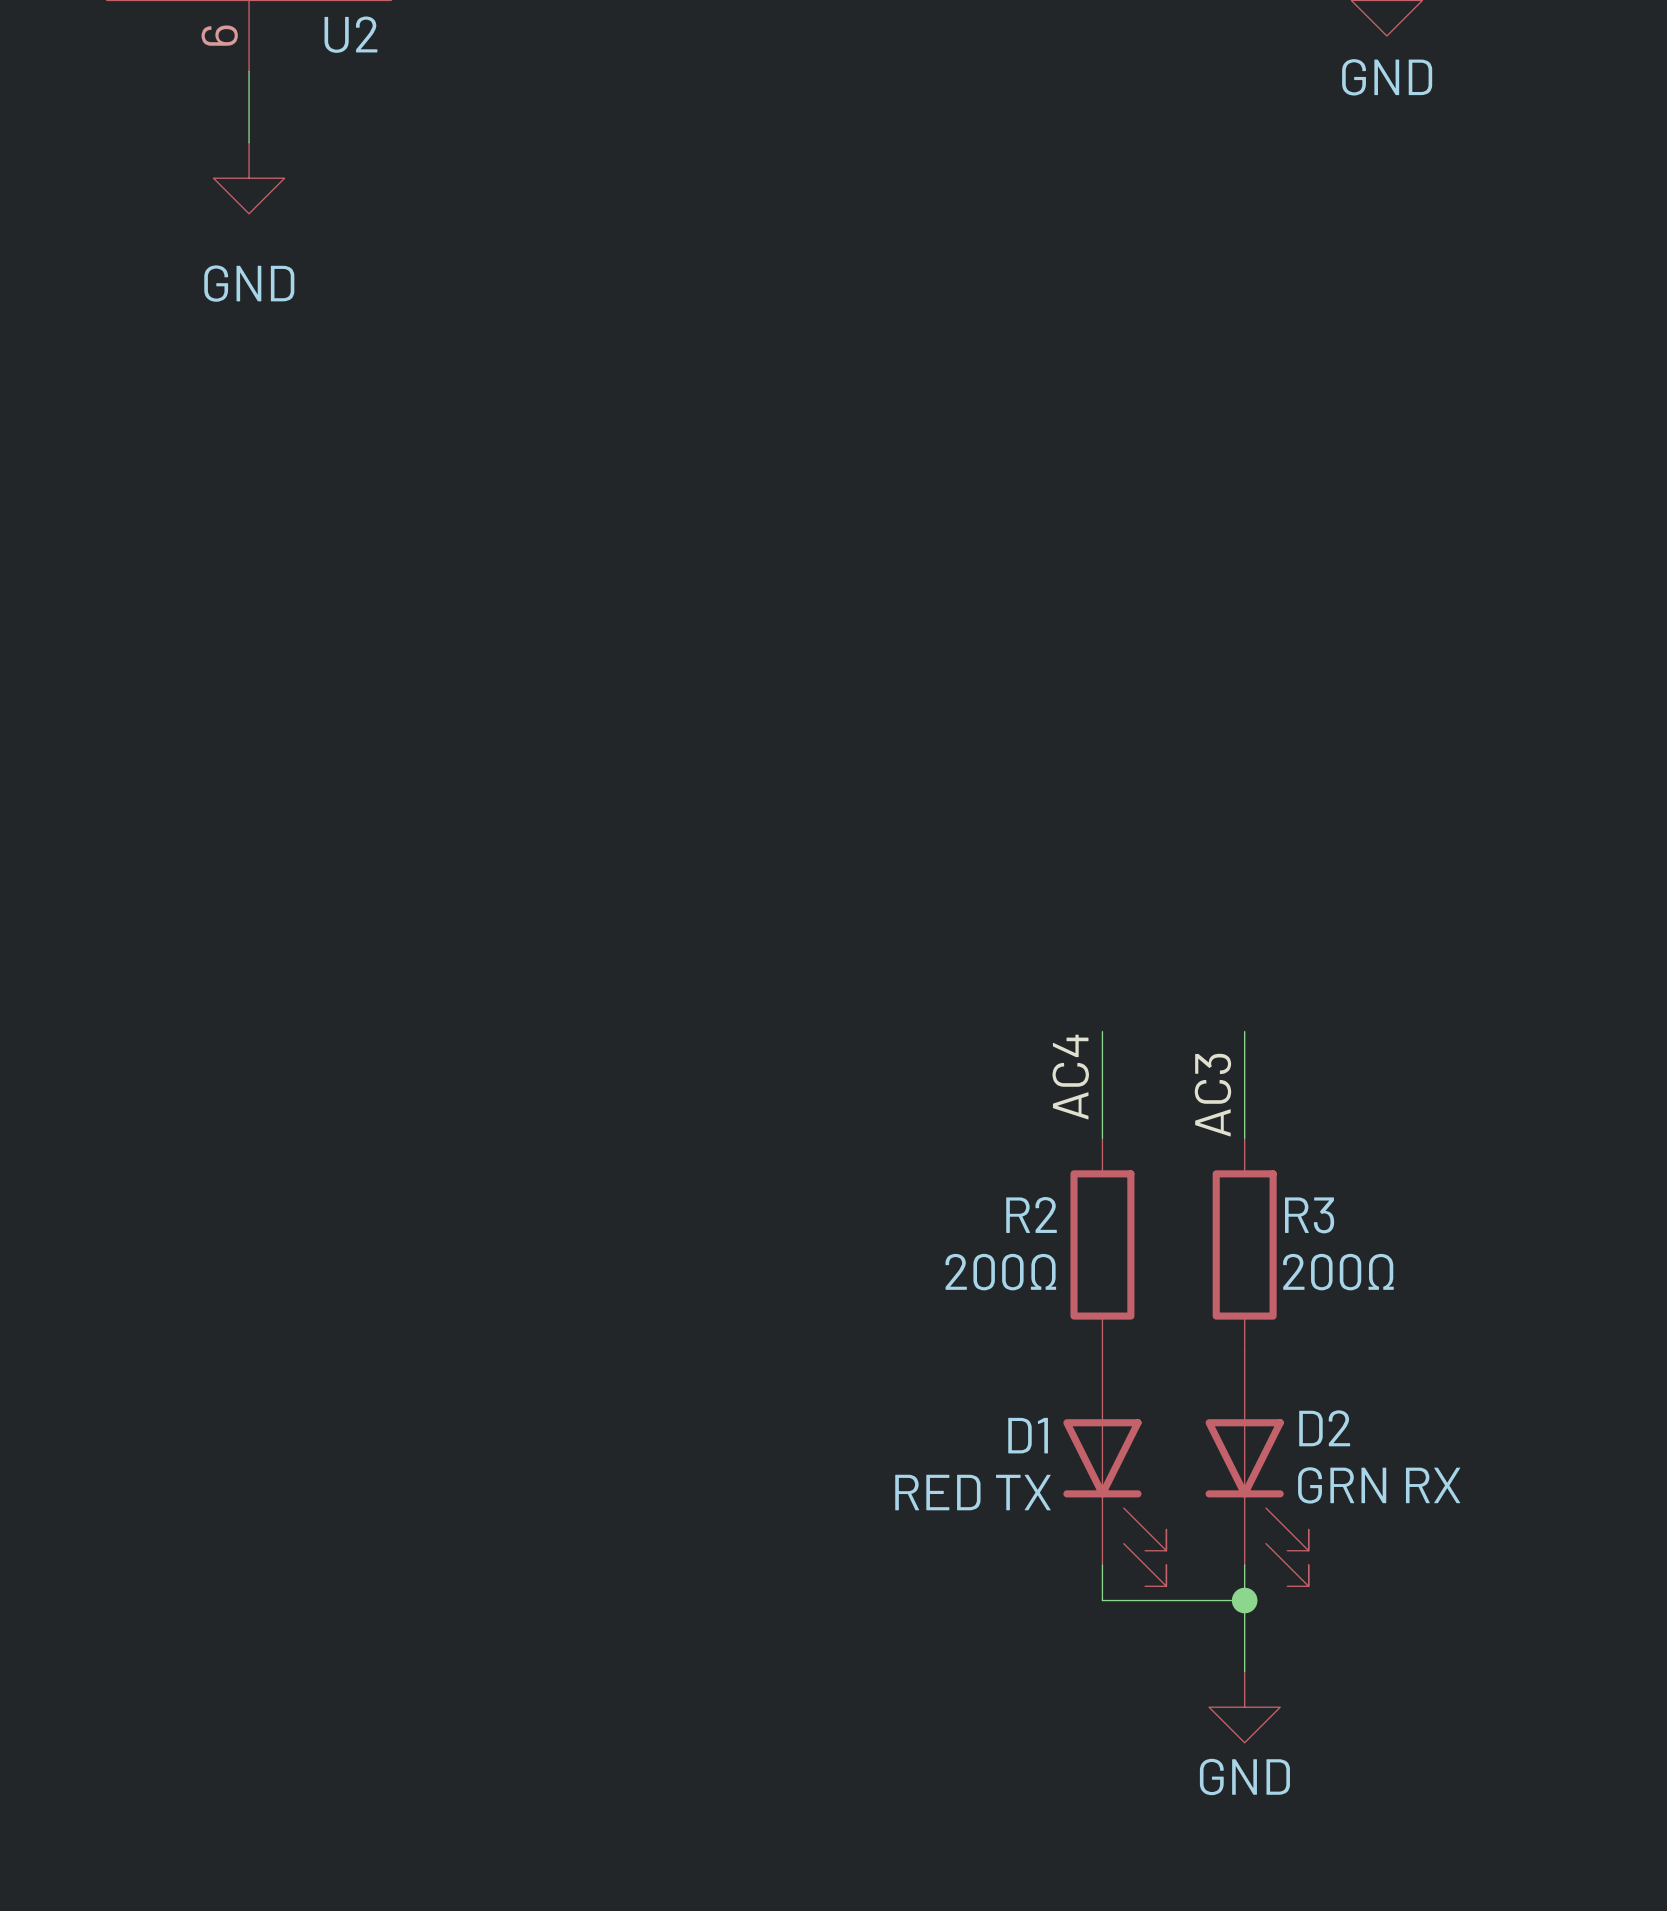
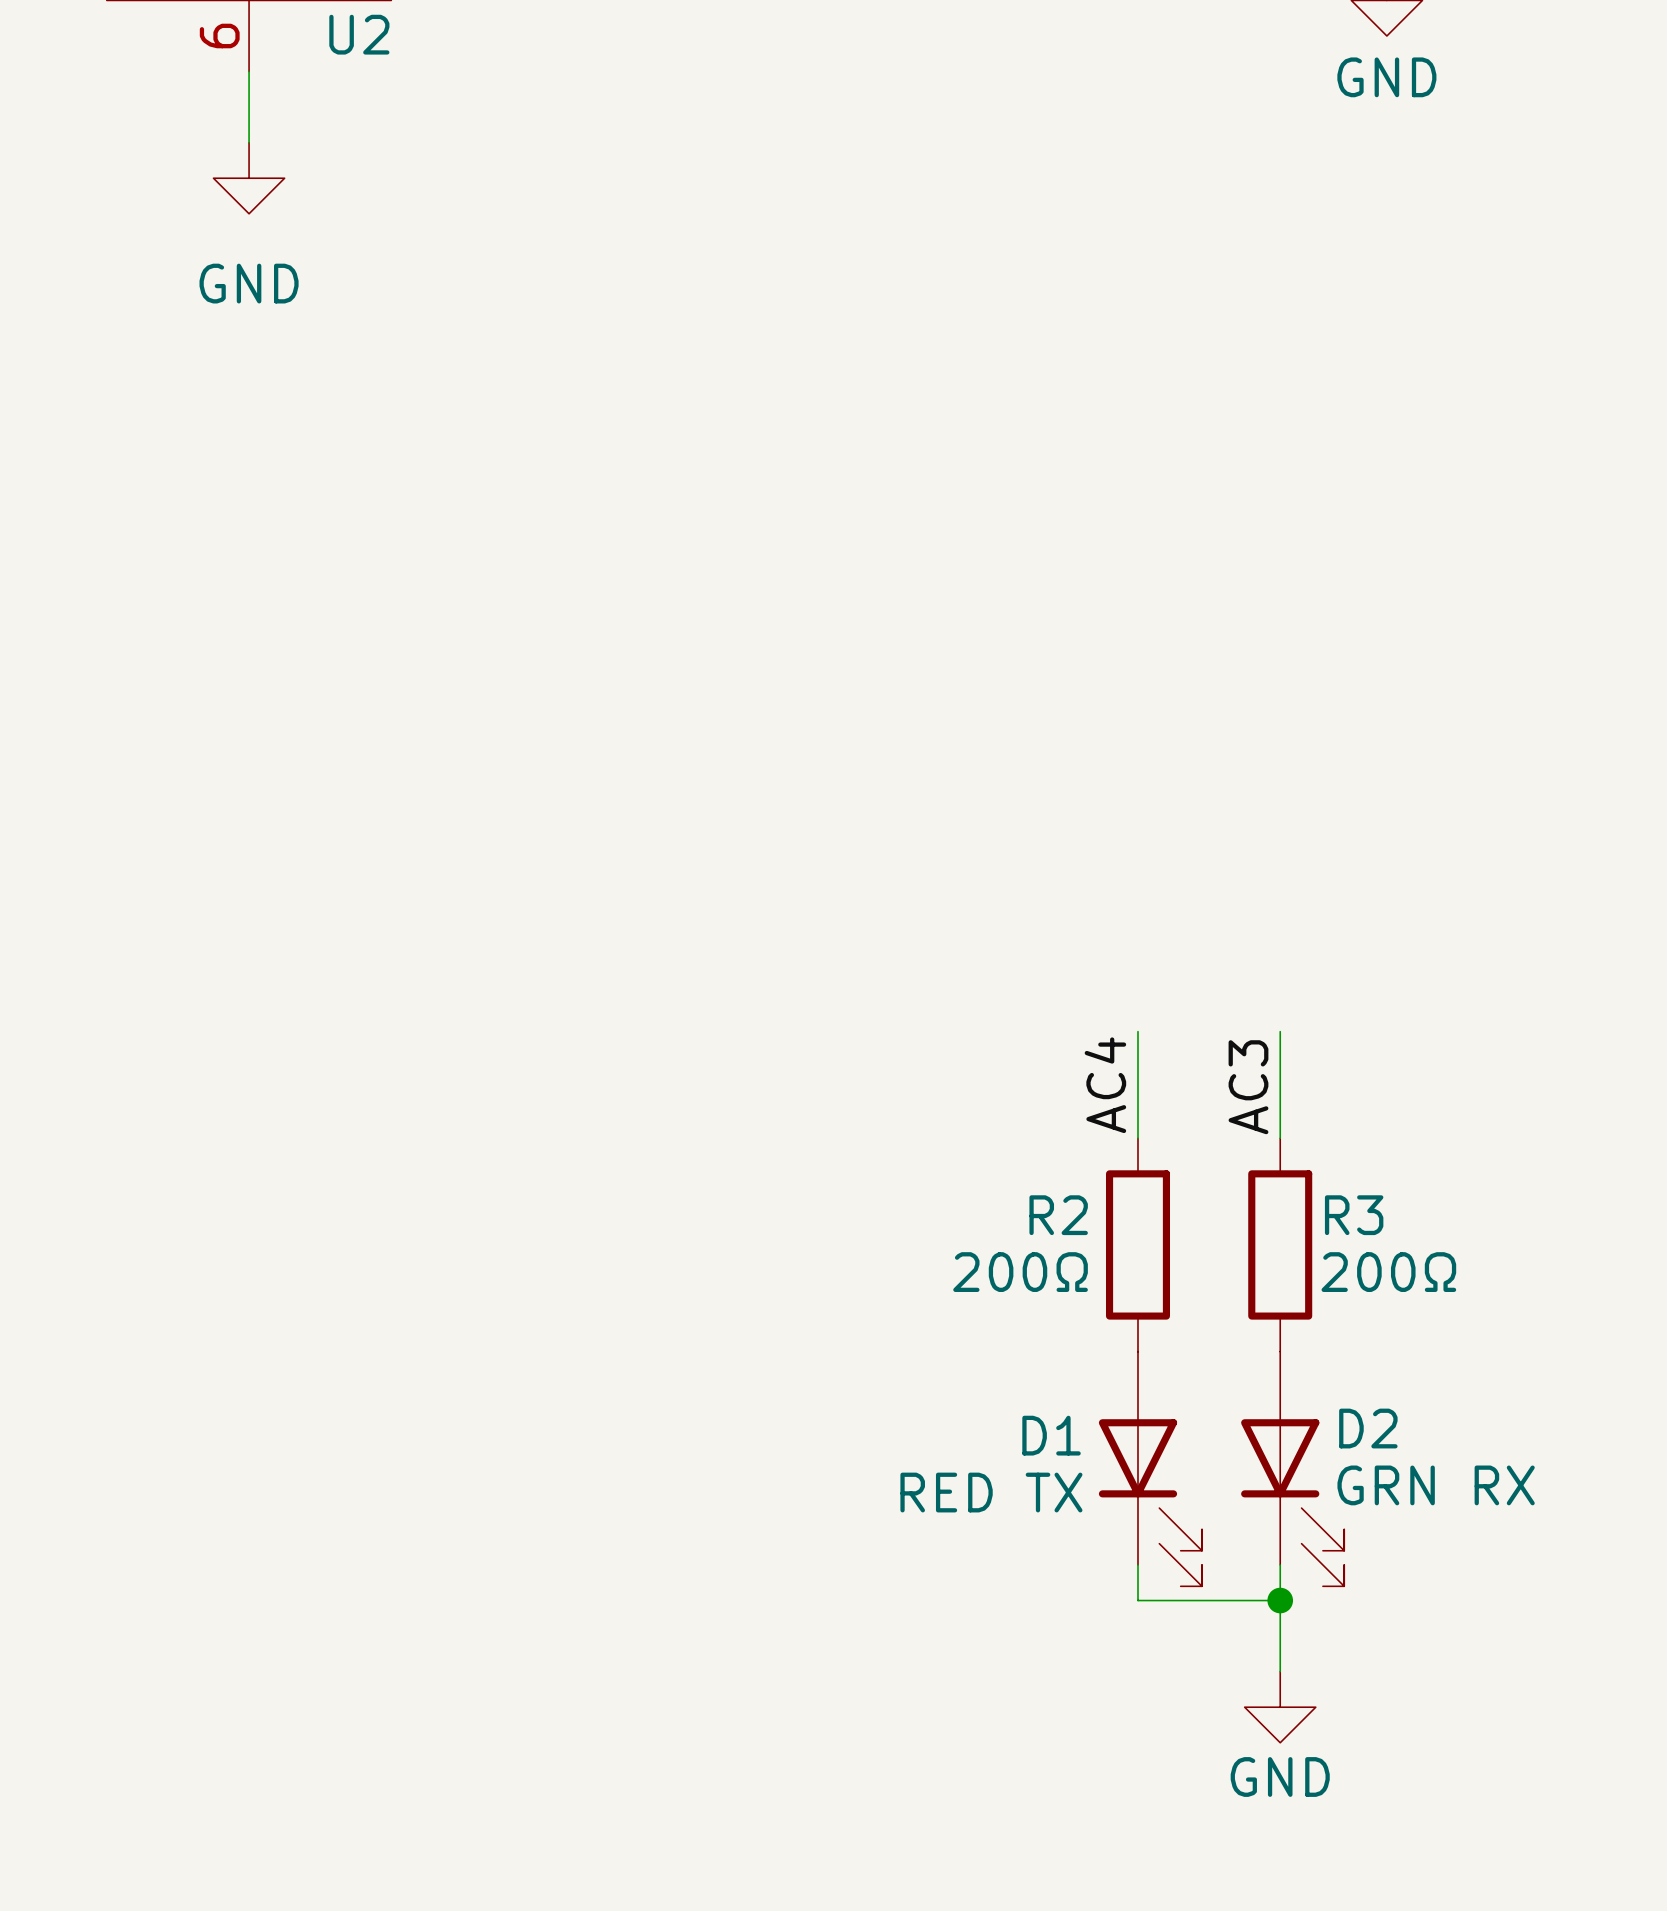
wire: (1102, 1031) (1102, 1138) -> (1137, 1031) (1137, 1138)
wire: (1244, 1031) (1244, 1138) -> (1280, 1031) (1280, 1138)
label position: AC4 (1070, 1077) -> AC4 (1105, 1085)
label position: AC3 (1212, 1095) -> AC3 (1248, 1087)
R2 position: (1102, 1244) -> (1137, 1244)
R3 position: (1244, 1244) -> (1280, 1244)
D1 position: (1114, 1468) -> (1150, 1468)
D2 position: (1257, 1468) -> (1292, 1468)
wire: (1102, 1564) (1102, 1600) (1137, 1600) -> (1137, 1564) (1137, 1600)
wire: (1244, 1564) (1244, 1671) -> (1280, 1564) (1280, 1671)
wire: none -> (1244, 1600) (1280, 1600)
junction position: (1244, 1600) -> (1280, 1600)
power symbol position: GND (1244, 1707) -> GND (1280, 1707)

